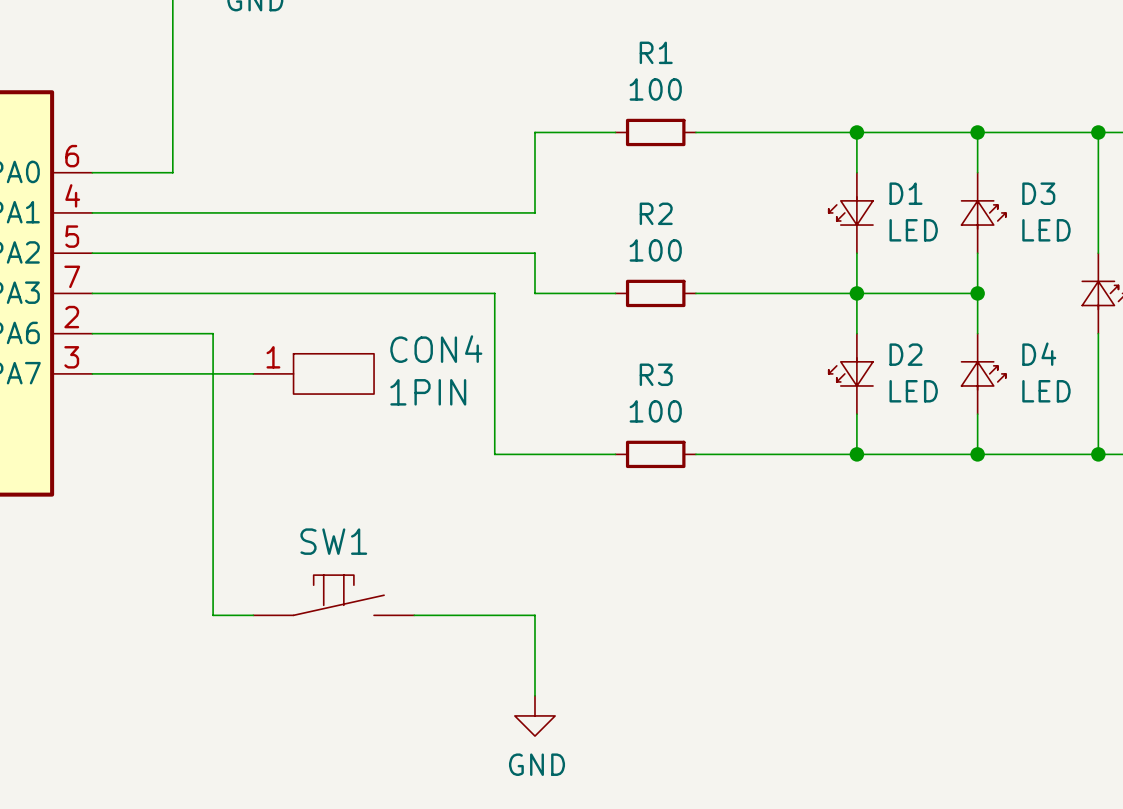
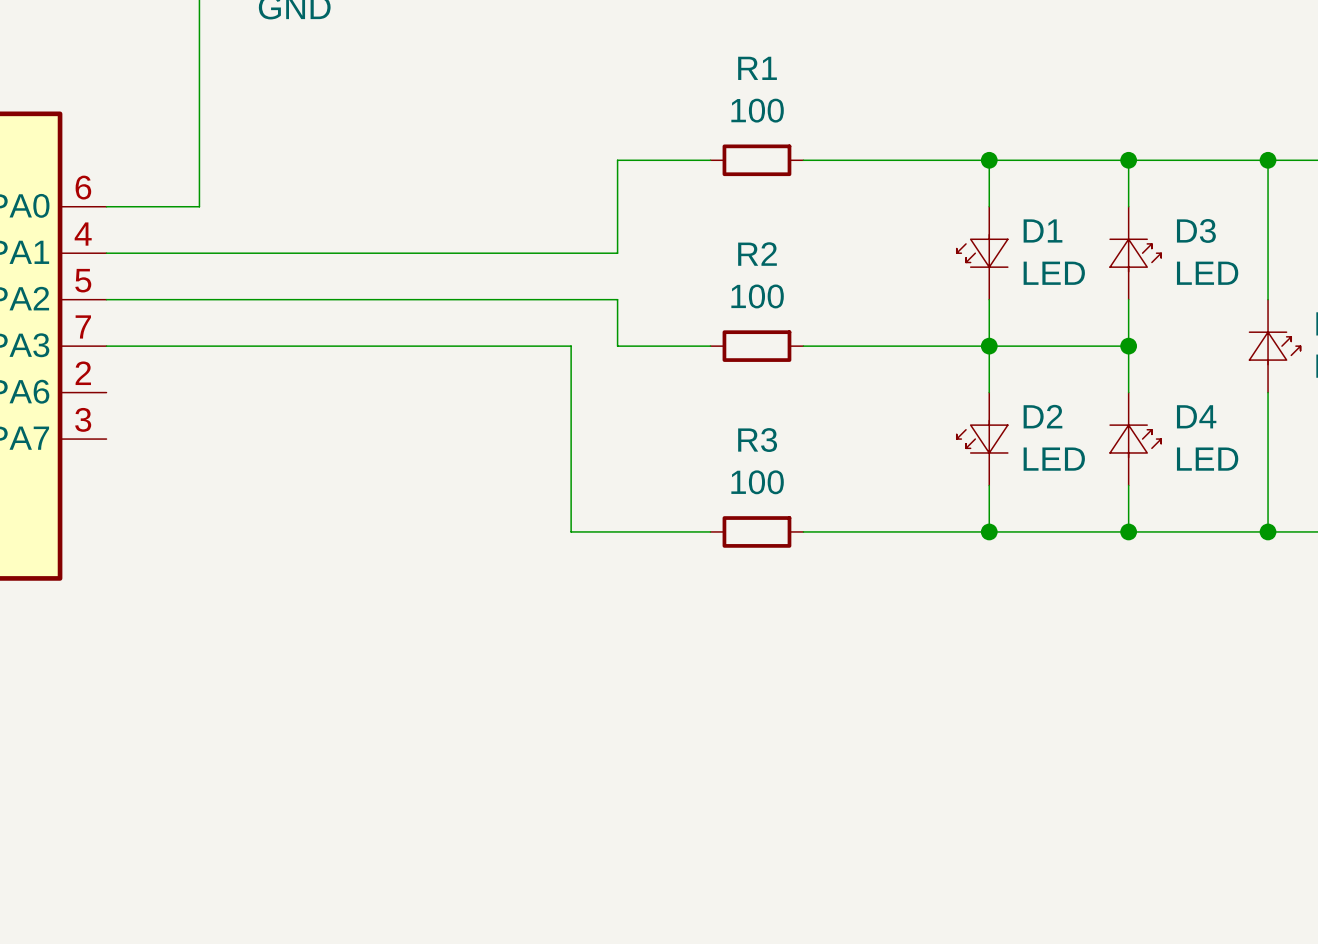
wire: (92, 333) (213, 333) (213, 615) (253, 615) -> none
wire: (92, 373) (253, 373) -> none
CON4: 1PIN (313, 373) -> none
SW1: (333, 595) -> none
wire: (414, 615) (534, 615) (534, 695) -> none
power symbol: GND (534, 715) -> none

